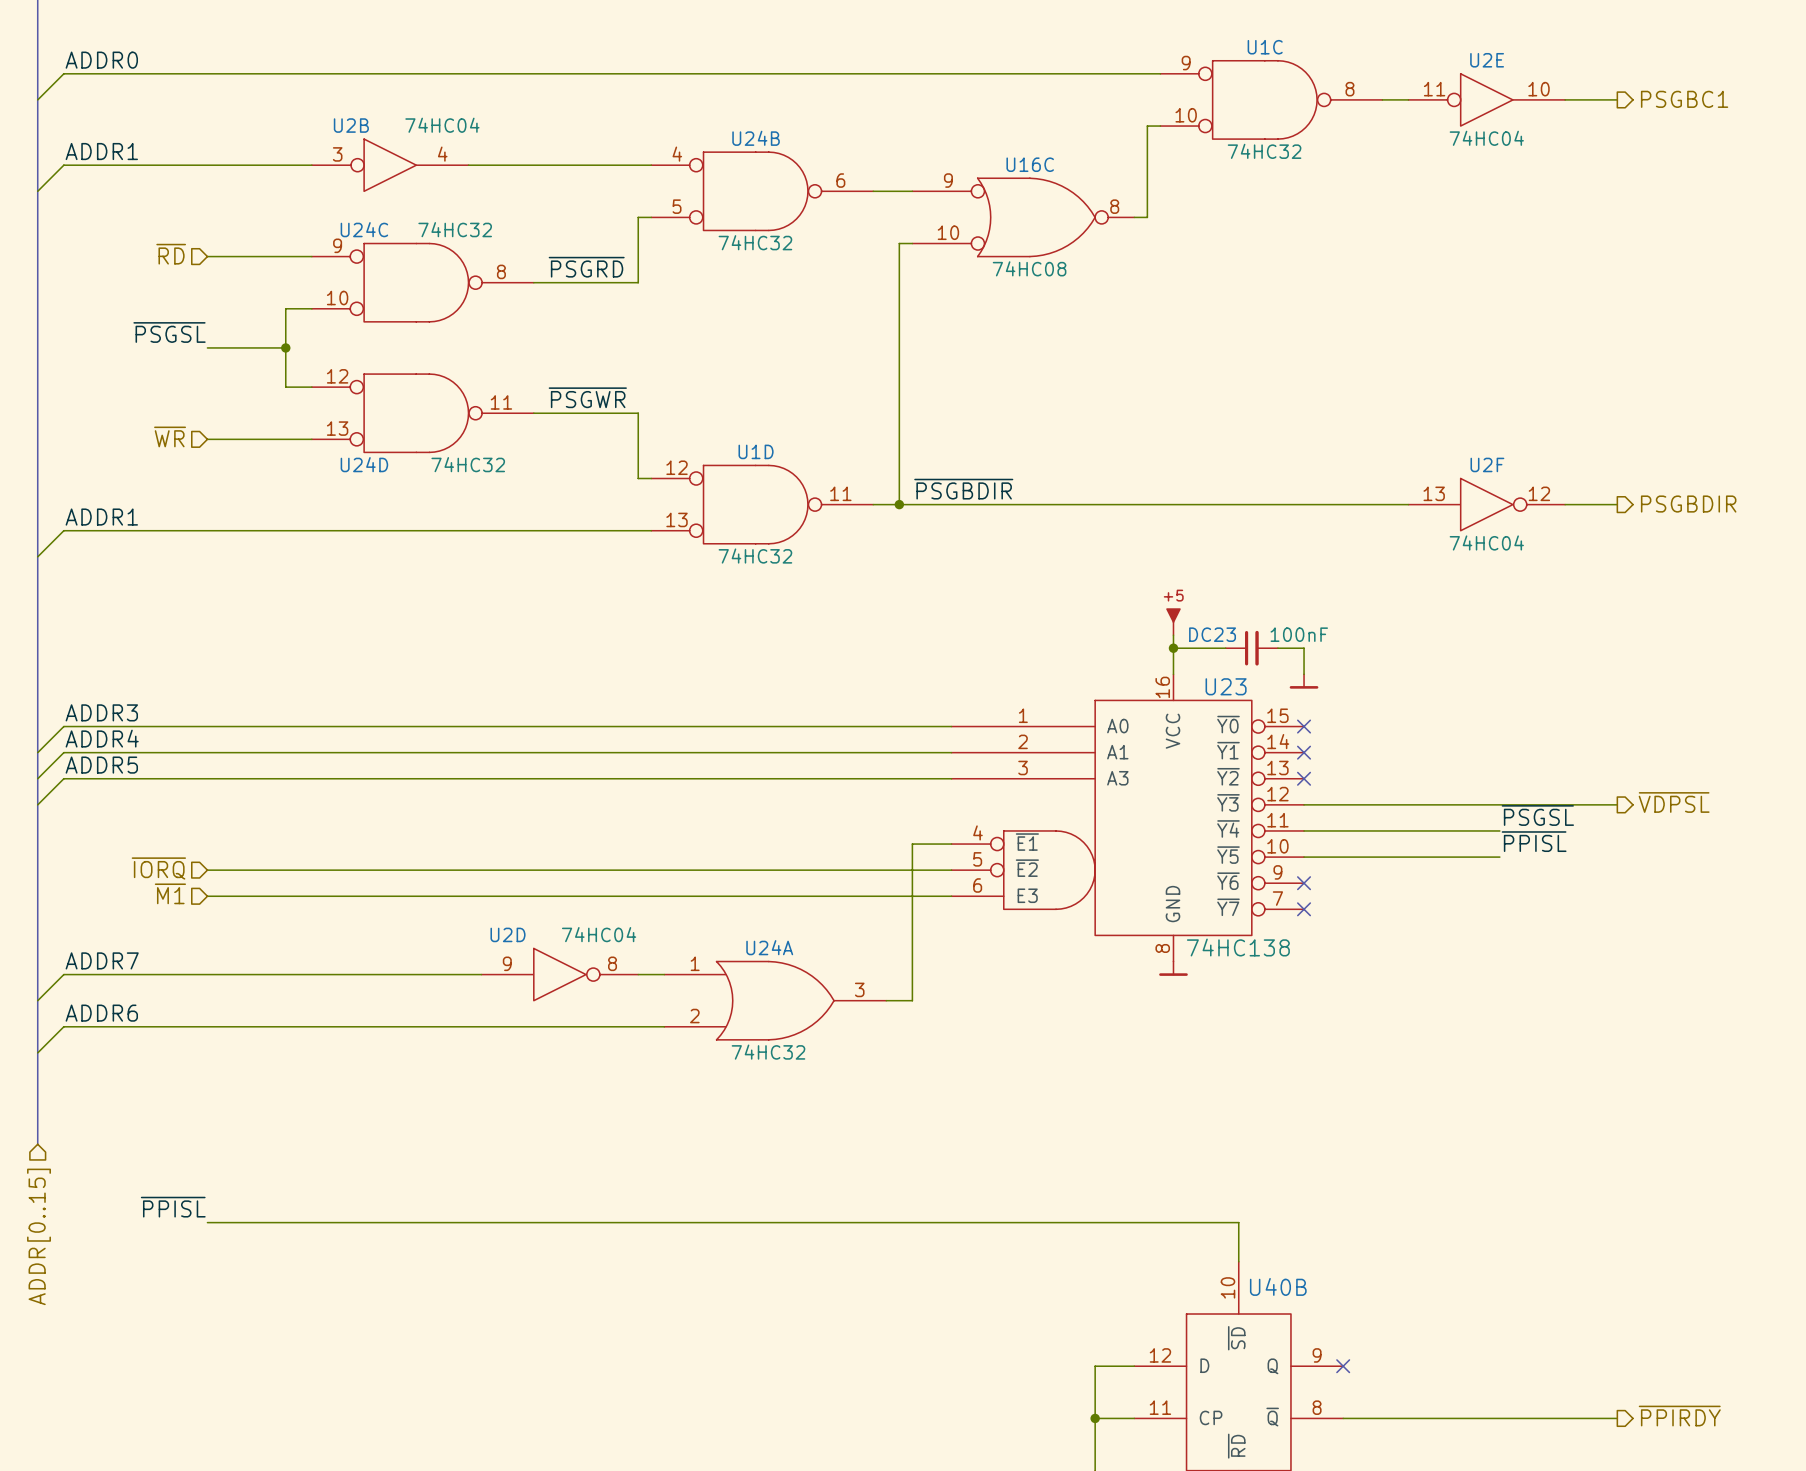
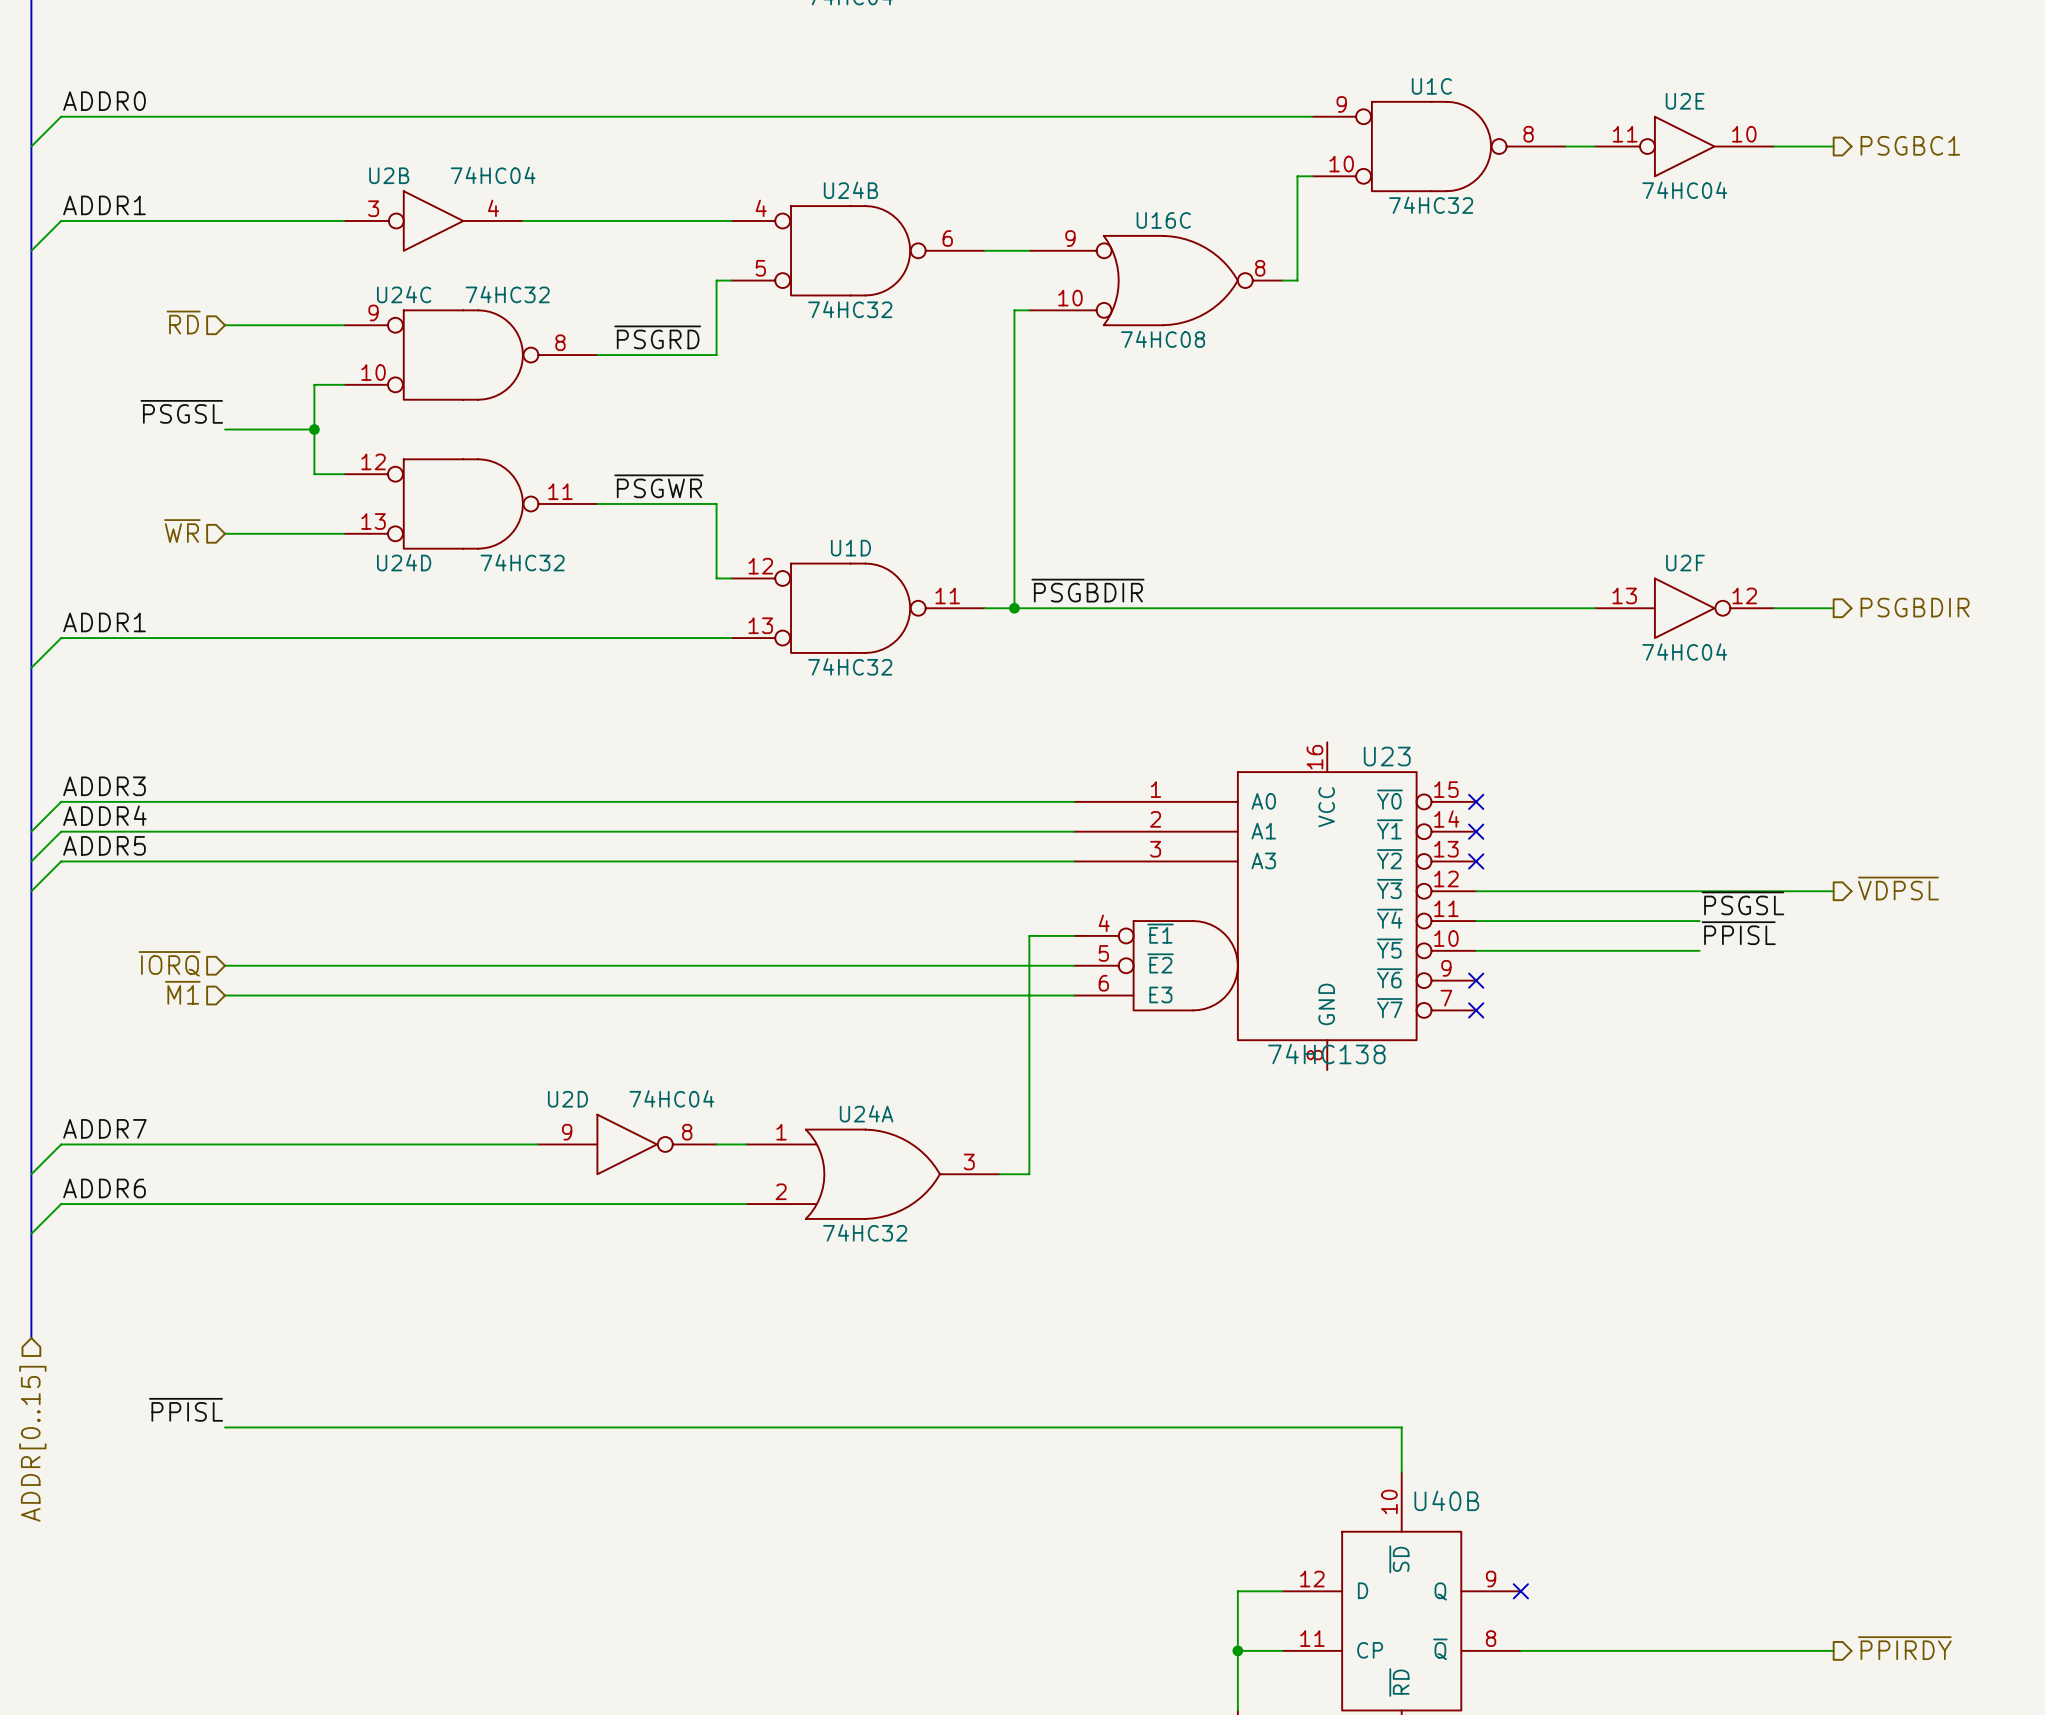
power symbol: (1173, 622) -> none
wire: (1173, 635) (1173, 674) -> none
junction: (1173, 648) -> none
DC23: 100nF (1251, 648) -> none
wire: (1277, 648) (1304, 648) (1304, 674) -> none
label: none -> ADDR3 (104, 786)
no-connect mark: none -> (1476, 801)
power symbol: (1304, 681) -> none
no-connect mark: none -> (1476, 831)
label: ADDR3 (101, 712) -> ADDR5 (104, 845)
label position: ADDR4 (102, 738) -> ADDR4 (104, 815)
wire: (951, 752) (63, 752) (37, 778) -> (1074, 801) (61, 801) (31, 831)
wire: none -> (1476, 891) (1833, 891)
no-connect mark: (1304, 752) -> none
label: ADDR5 (101, 765) -> none
wire: (951, 778) (63, 778) (37, 804) -> (1074, 831) (61, 831) (31, 861)
no-connect mark: (1304, 778) -> none
wire: none -> (1074, 935) (1029, 935) (1029, 995) (225, 995)
hierarchical label position: ~{VDPSL} (1674, 802) -> ~{VDPSL} (1898, 888)
wire: (1499, 804) (1617, 804) -> none
label position: ~{PSGSL} (1537, 815) -> ~{PSGSL} (1742, 903)
U23 position: (1127, 817) -> (1275, 906)
wire: (1304, 830) (1499, 830) -> none
no-connect mark: none -> (1476, 980)
label position: ~{PPISL} (1534, 841) -> ~{PPISL} (1738, 933)
wire: (1304, 857) (1499, 857) -> (1476, 921) (1699, 921)
no-connect mark: none -> (1476, 1010)
hierarchical label position: ~{IORQ} (158, 868) -> ~{IORQ} (169, 963)
wire: (207, 870) (951, 870) -> none
no-connect mark: (1304, 883) -> none
hierarchical label position: ~{M1} (170, 893) -> ~{M1} (182, 992)
wire: (207, 896) (951, 896) -> (225, 965) (1074, 965)
no-connect mark: (1304, 909) -> none
U23 value position: 74HC138 (1238, 947) -> 74HC138 (1326, 1054)
power symbol: (1173, 968) -> none

